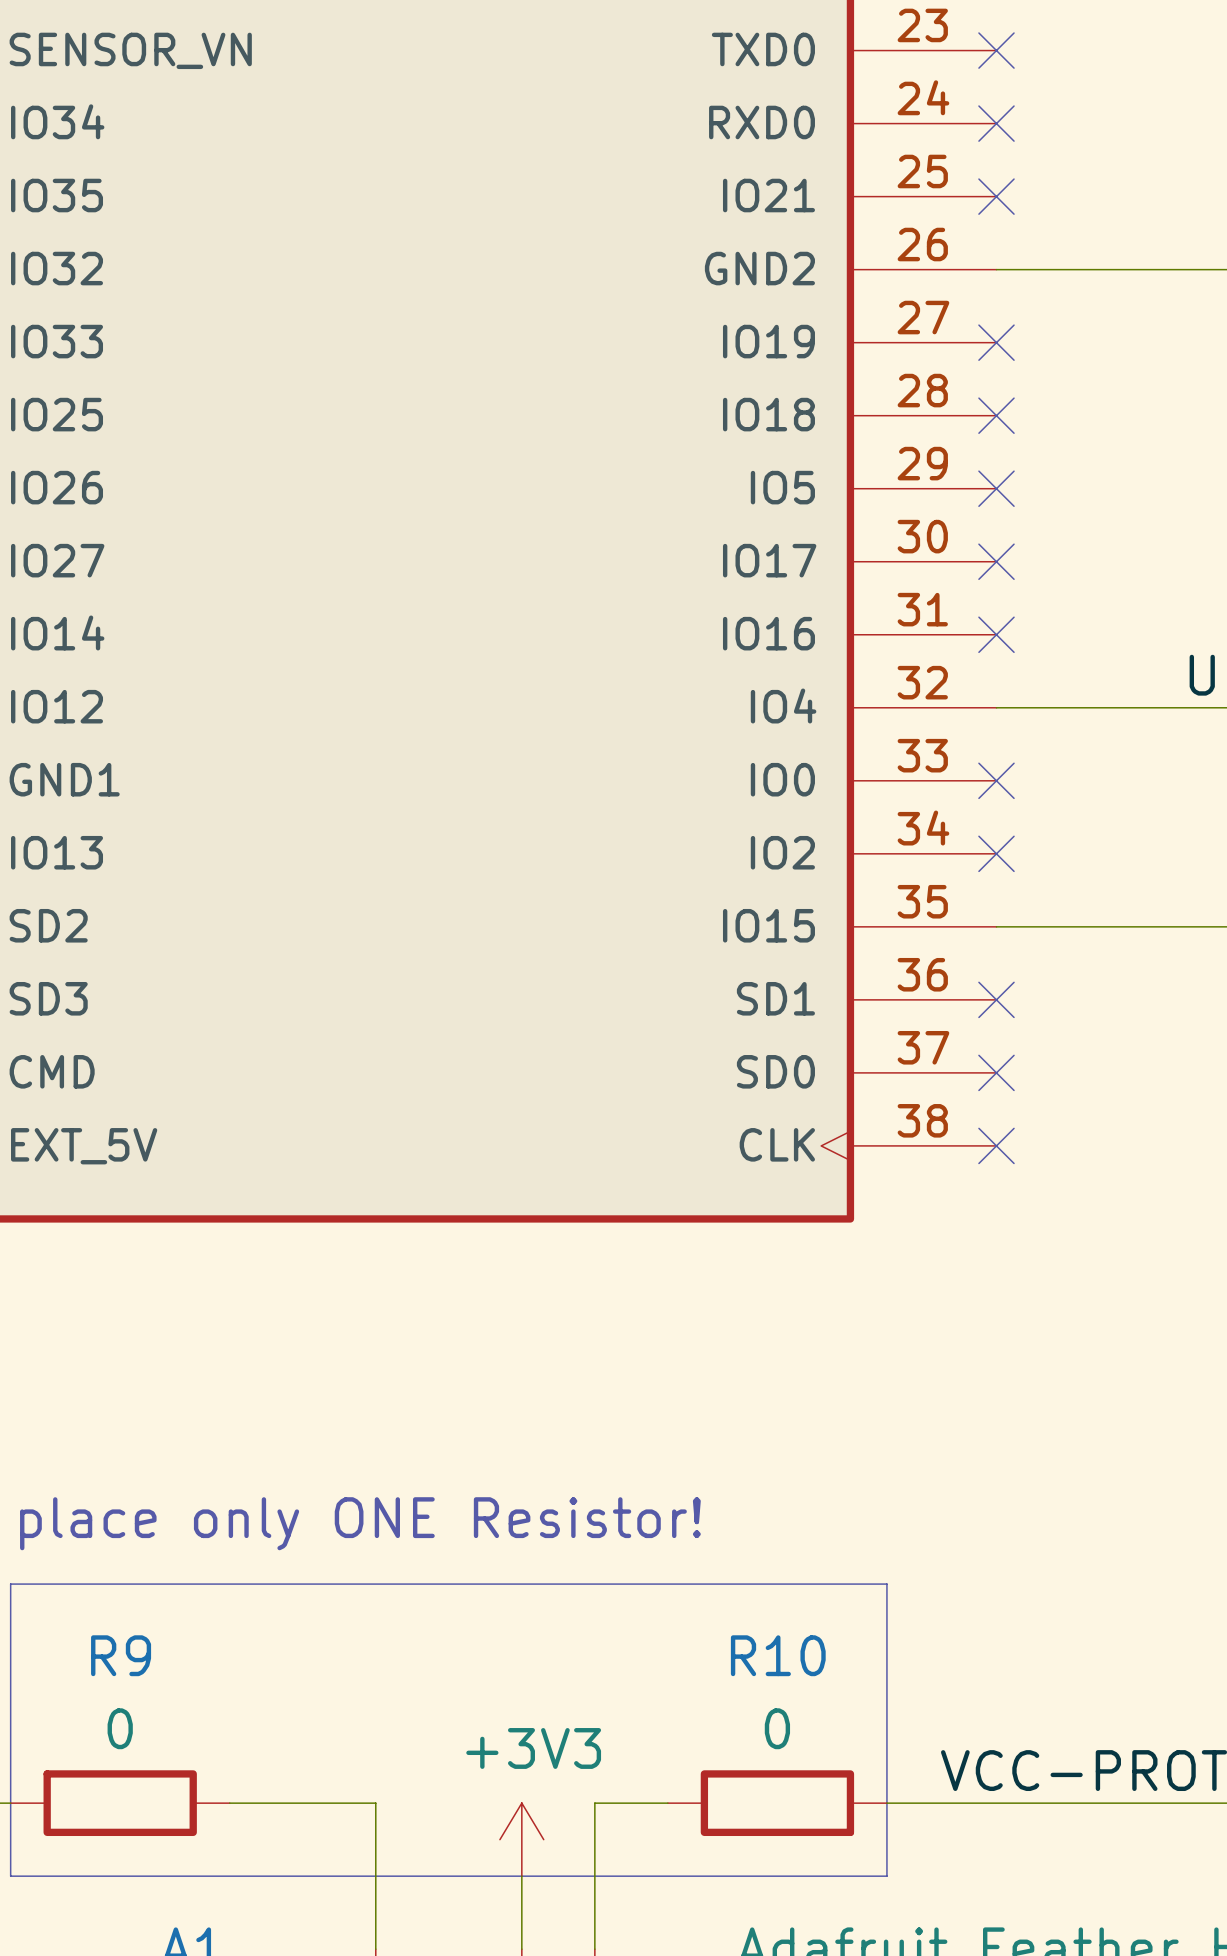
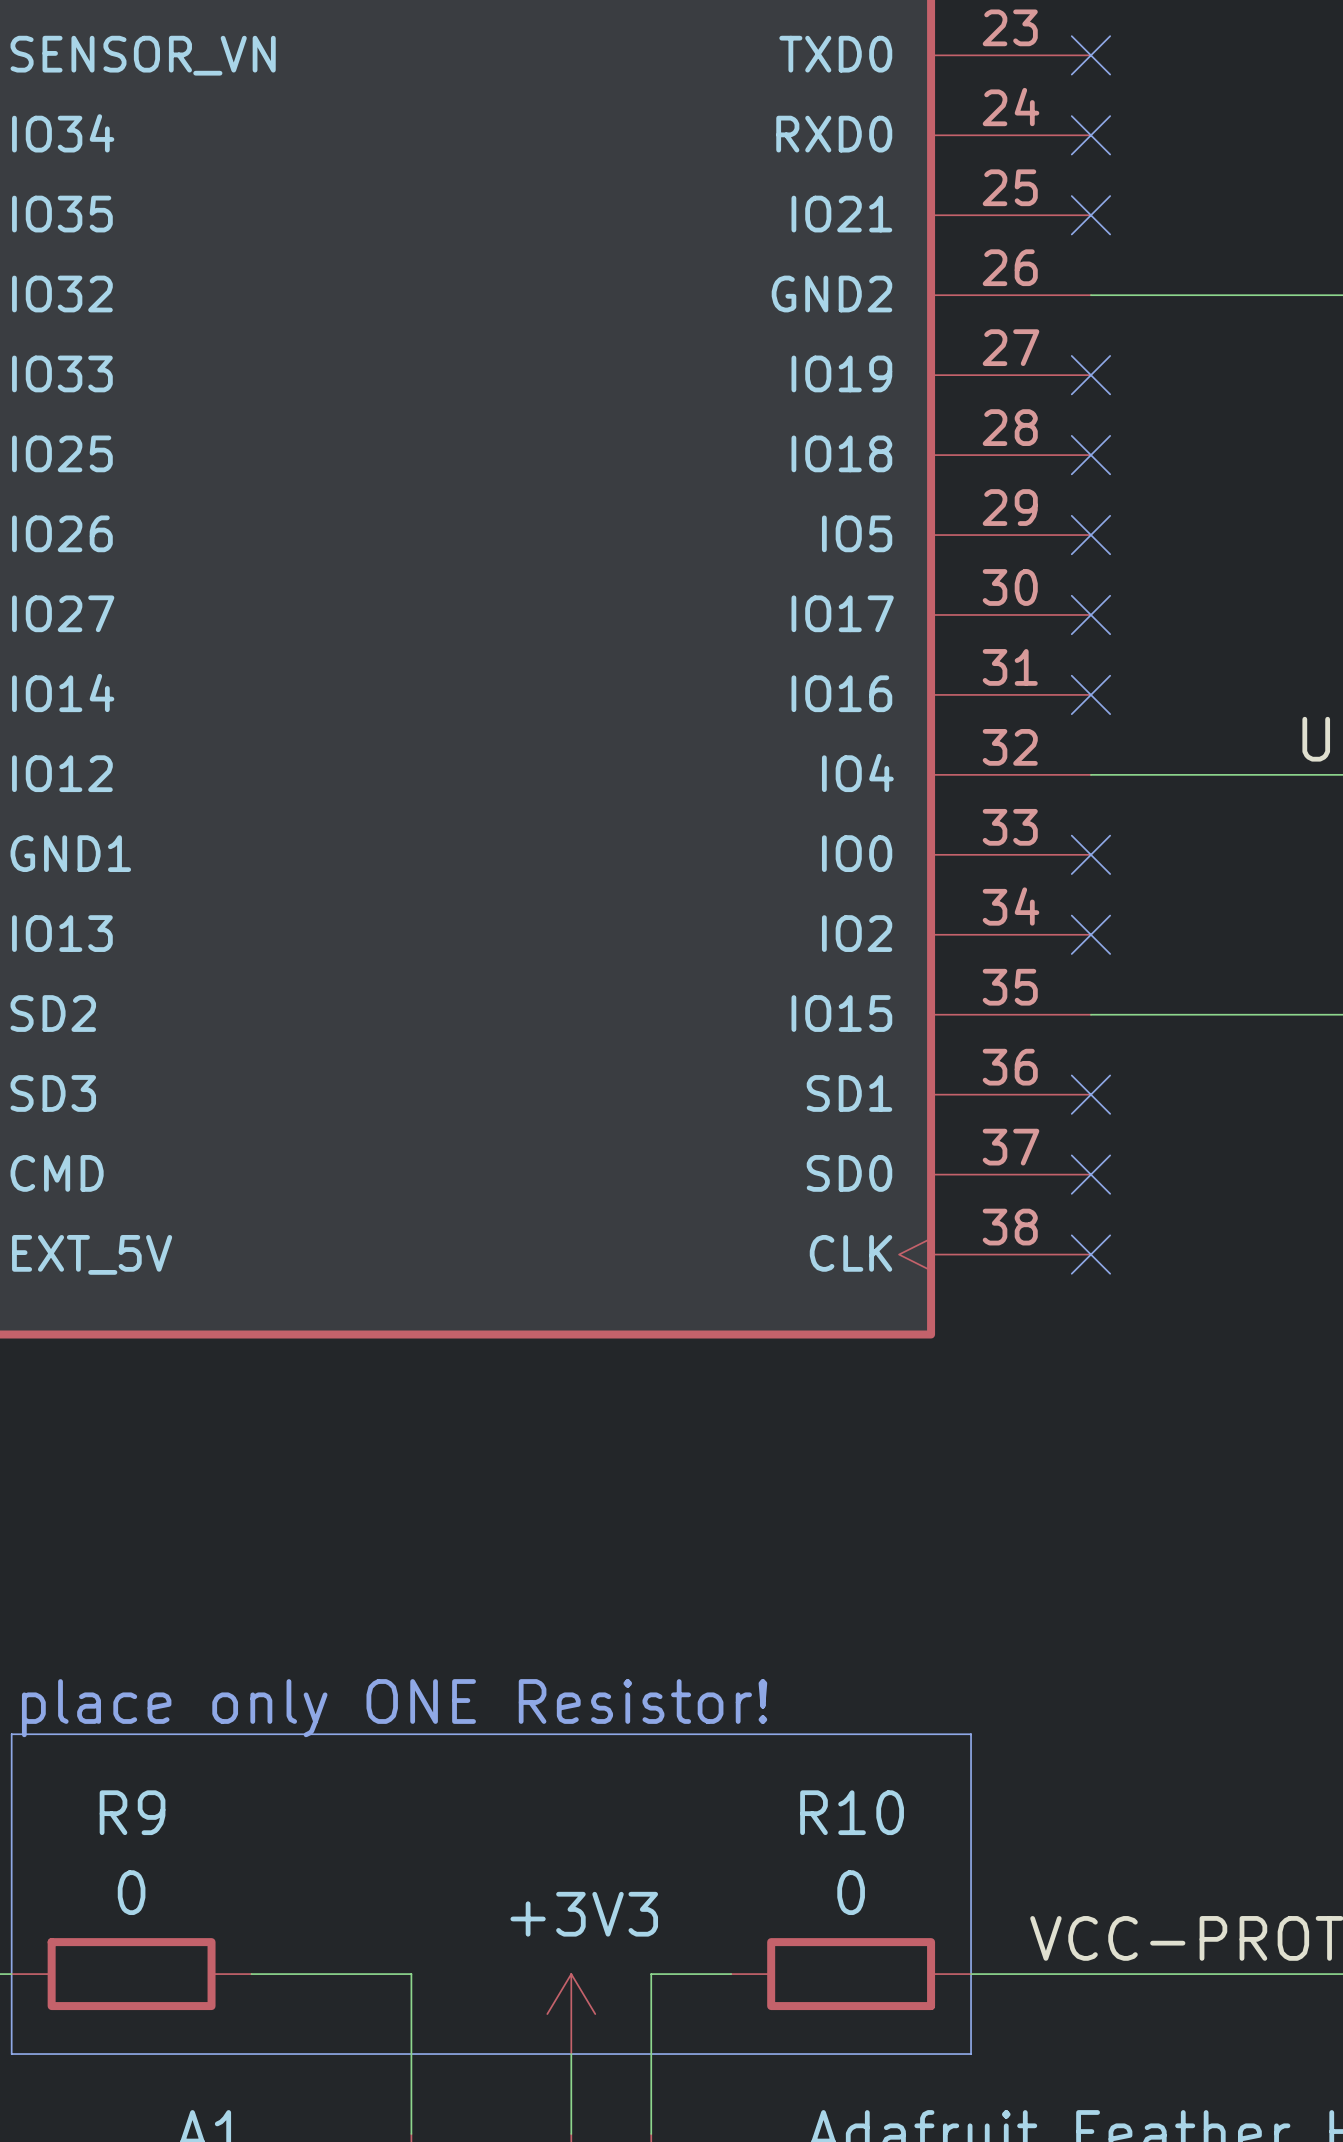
text position: place only ONE Resistor! (360, 1523) -> place only ONE Resistor! (394, 1708)

